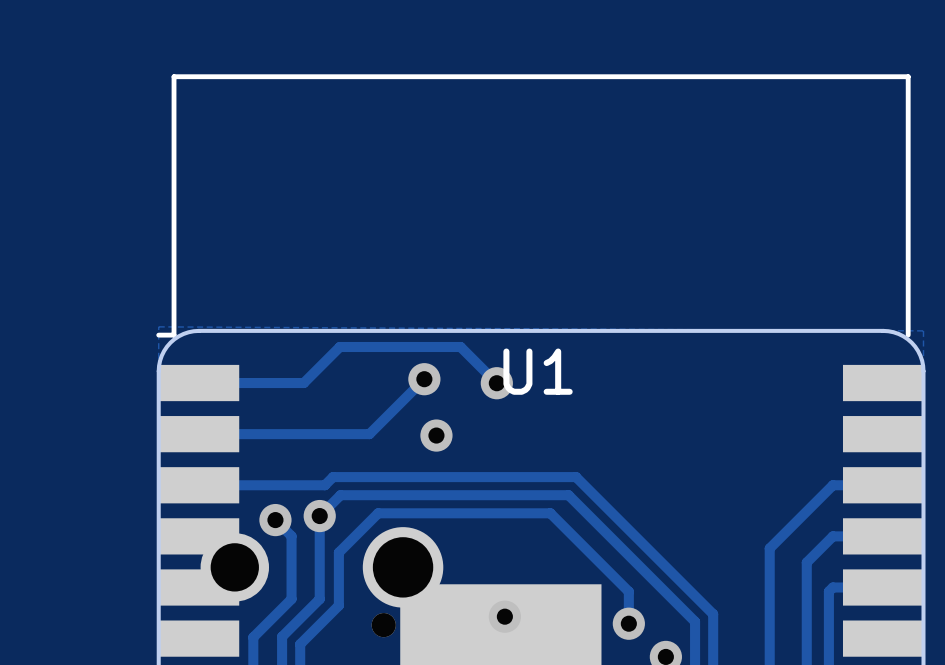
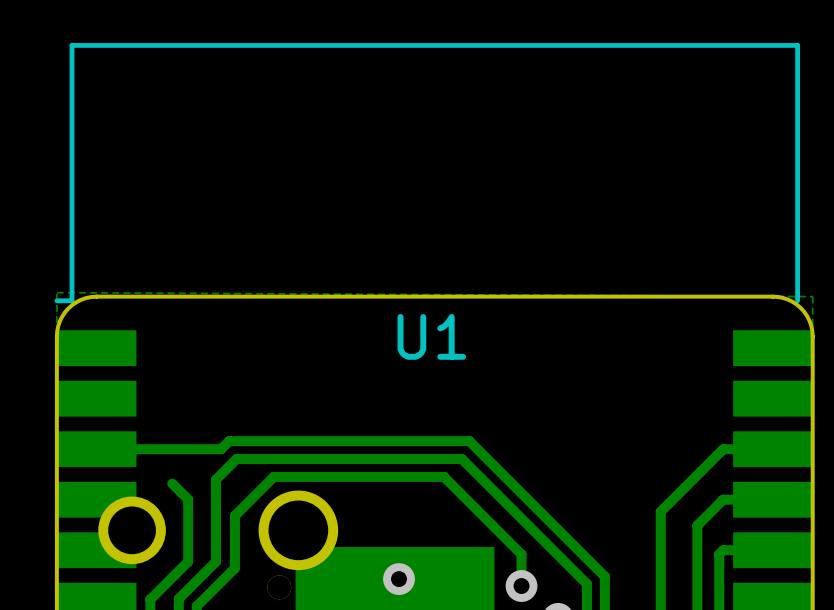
track: (424, 379) (369, 434) (198, 434) -> none
via: (424, 379) -> none
track: (198, 383) (303, 383) (339, 346) (460, 346) (496, 383) -> none
via: (496, 383) -> none
via: (436, 435) -> none
via: (319, 516) -> none
via: (275, 520) -> none

